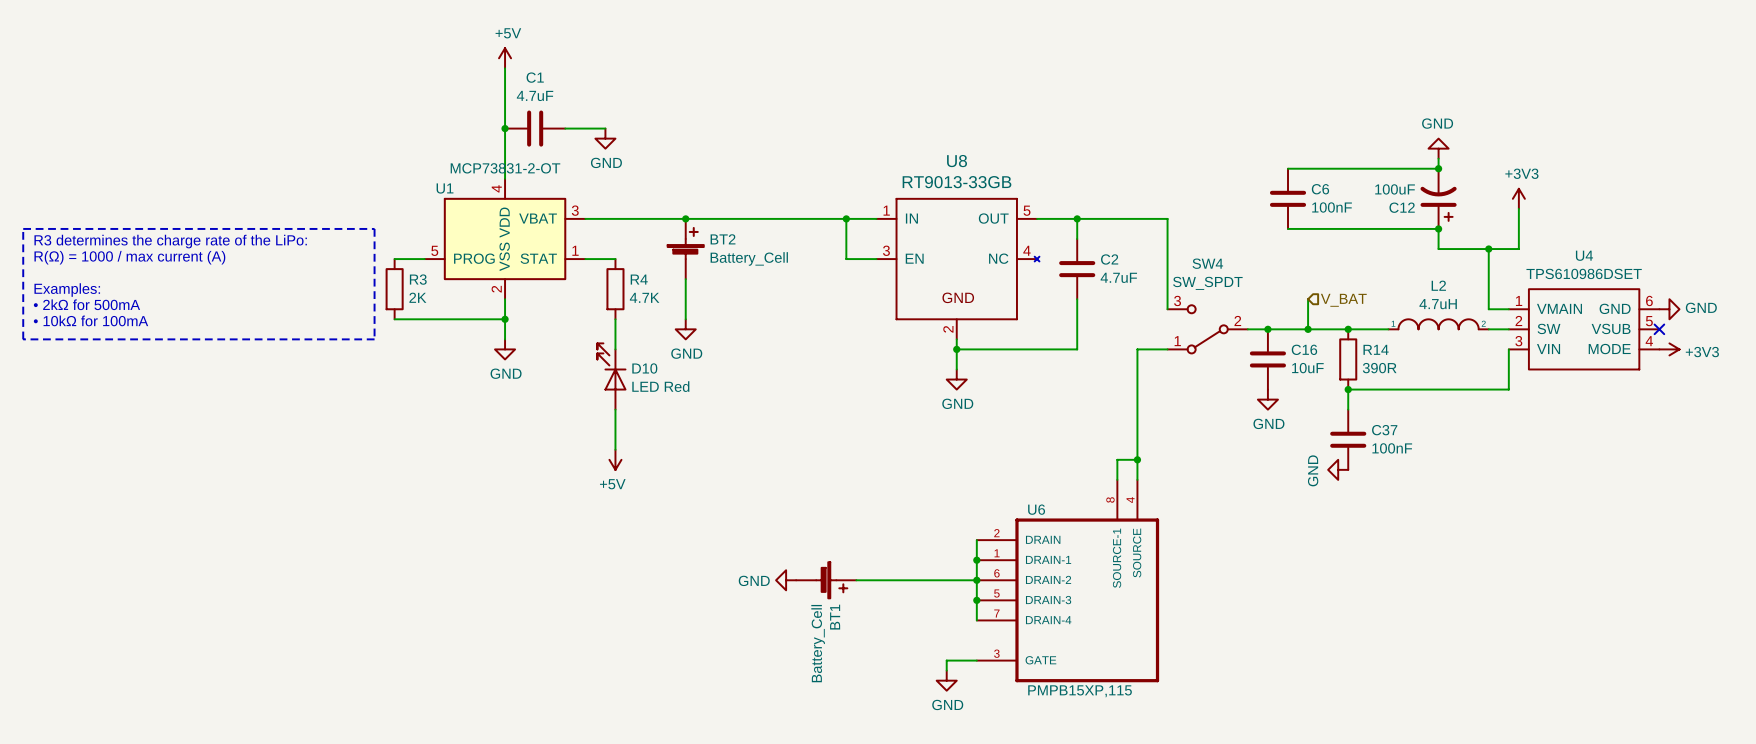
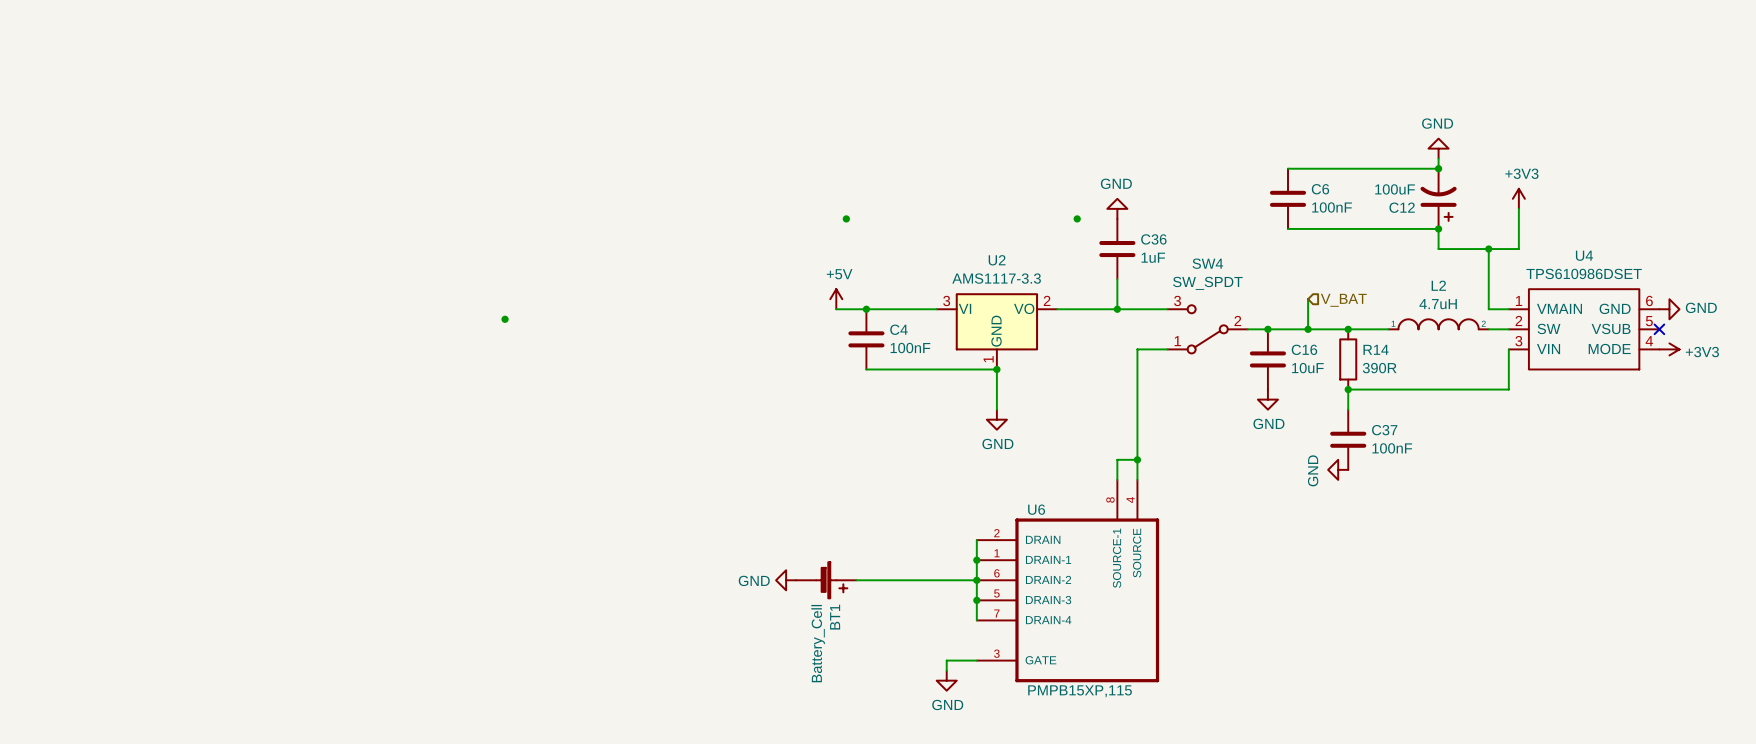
power symbol: +5V (505, 58) -> none
wire: (505, 68) (505, 178) -> none
junction: (505, 128) -> none
C1: 4.7uF (535, 128) -> none
wire: (565, 128) (605, 128) -> none
power symbol: GND (605, 138) -> none
power symbol: none -> GND (1117, 208)
wire: (585, 218) (876, 218) -> none
junction: (685, 218) -> none
wire: (846, 218) (846, 259) (876, 259) -> none
wire: (1037, 218) (1167, 218) (1167, 309) -> (1057, 309) (1167, 309)
wire: (1077, 218) (1077, 238) -> none
line: (23, 228) (23, 339) (374, 339) (374, 228) (23, 228) -> none
U1: MCP73831-2-OT (505, 238) -> none
text: R3 determines the charge rate of the LiPo: (170, 241) -> none
BT2: Battery_Cell (685, 249) -> none
C36: none -> 1uF (1117, 249)
text: R(Ω) = 1000 / max current (A) (129, 257) -> none
wire: (394, 259) (424, 259) -> none
wire: (585, 259) (615, 259) -> none
U8: RT9013-33GB (957, 269) -> none
C2: 4.7uF (1077, 269) -> none
wire: (685, 279) (685, 319) -> none
R3: 2K (394, 289) -> none
R4: 4.7K (615, 289) -> none
text: Examples: (67, 290) -> none
wire: (505, 299) (505, 339) -> none
power symbol: none -> +5V (836, 299)
wire: (1077, 299) (1077, 349) (956, 349) -> none
text: • 2kΩ for 500mA (86, 304) -> none
wire: none -> (836, 309) (936, 309)
junction: none -> (866, 309)
junction: none -> (1117, 309)
wire: (394, 319) (505, 319) -> none
wire: (615, 319) (615, 349) -> none
text: • 10kΩ for 100mA (91, 320) -> none
power symbol: GND (685, 329) -> none
U2: none -> AMS1117-3.3 (996, 331)
C4: none -> 100nF (866, 339)
wire: (956, 339) (956, 369) -> (1117, 279) (1117, 309)
power symbol: GND (505, 349) -> none
junction position: (956, 349) -> (996, 369)
wire: none -> (866, 369) (996, 369) (996, 409)
D10: LED Red (611, 376) -> none
power symbol position: GND (956, 379) -> GND (996, 419)
wire: (615, 409) (615, 449) -> none
power symbol: +5V (615, 459) -> none

